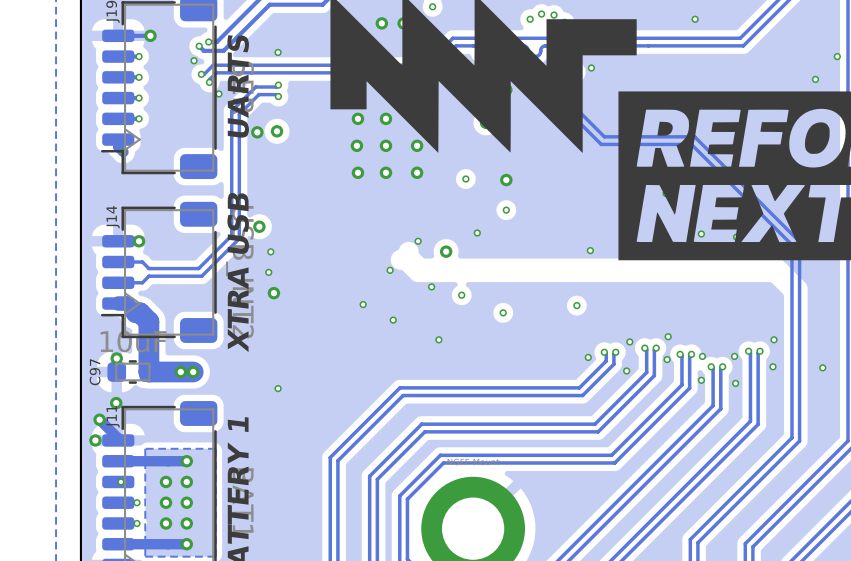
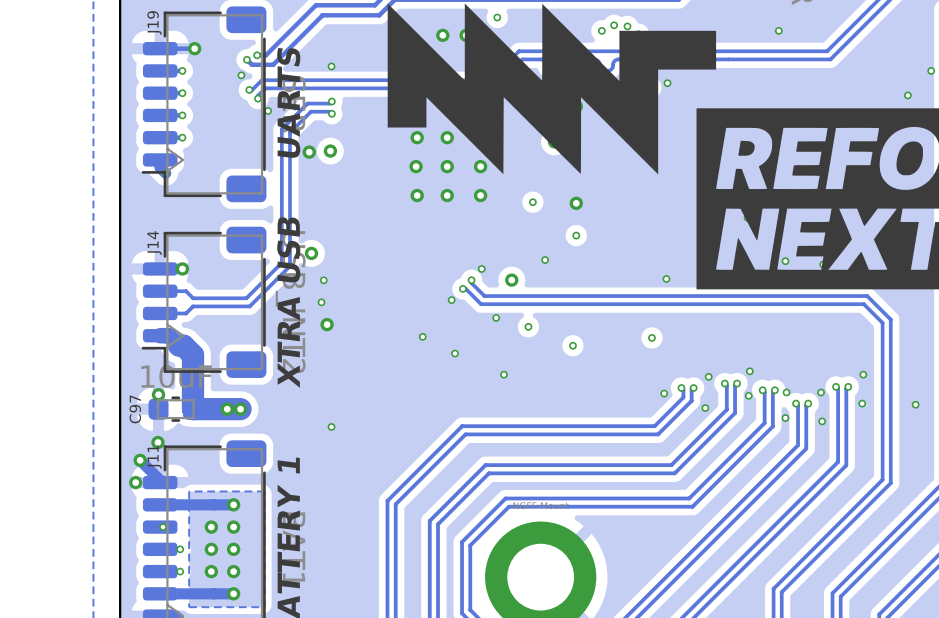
track: (560, 93) (604, 136) (694, 136) (799, 241) (799, 288) -> (471, 280) (471, 283) (484, 296) (867, 296) (890, 319)
track: (555, 98) (601, 144) (691, 144) (791, 244) (791, 291) -> (462, 288) (465, 288) (481, 304) (863, 304) (882, 322)
via: none -> (471, 280)
via: none -> (462, 288)

